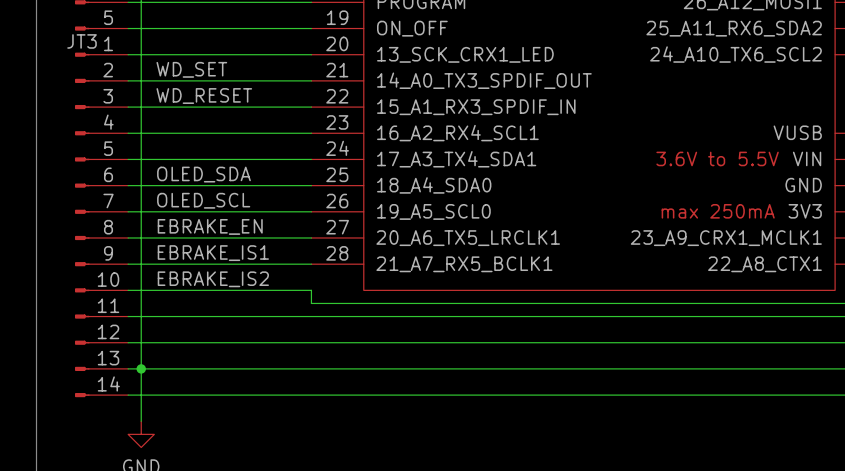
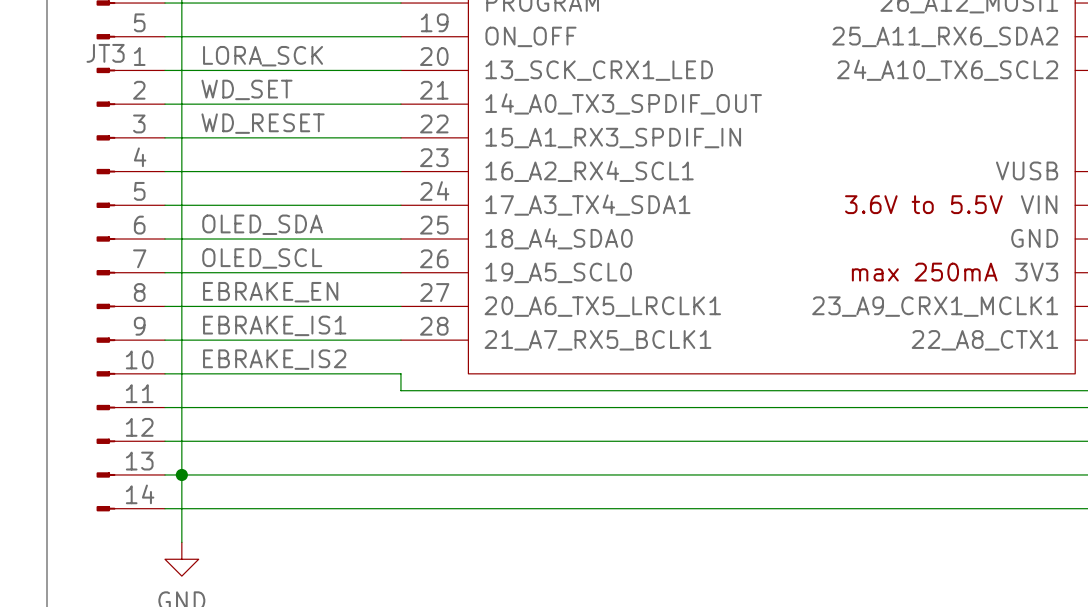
label: none -> LORA_SCK (263, 56)

